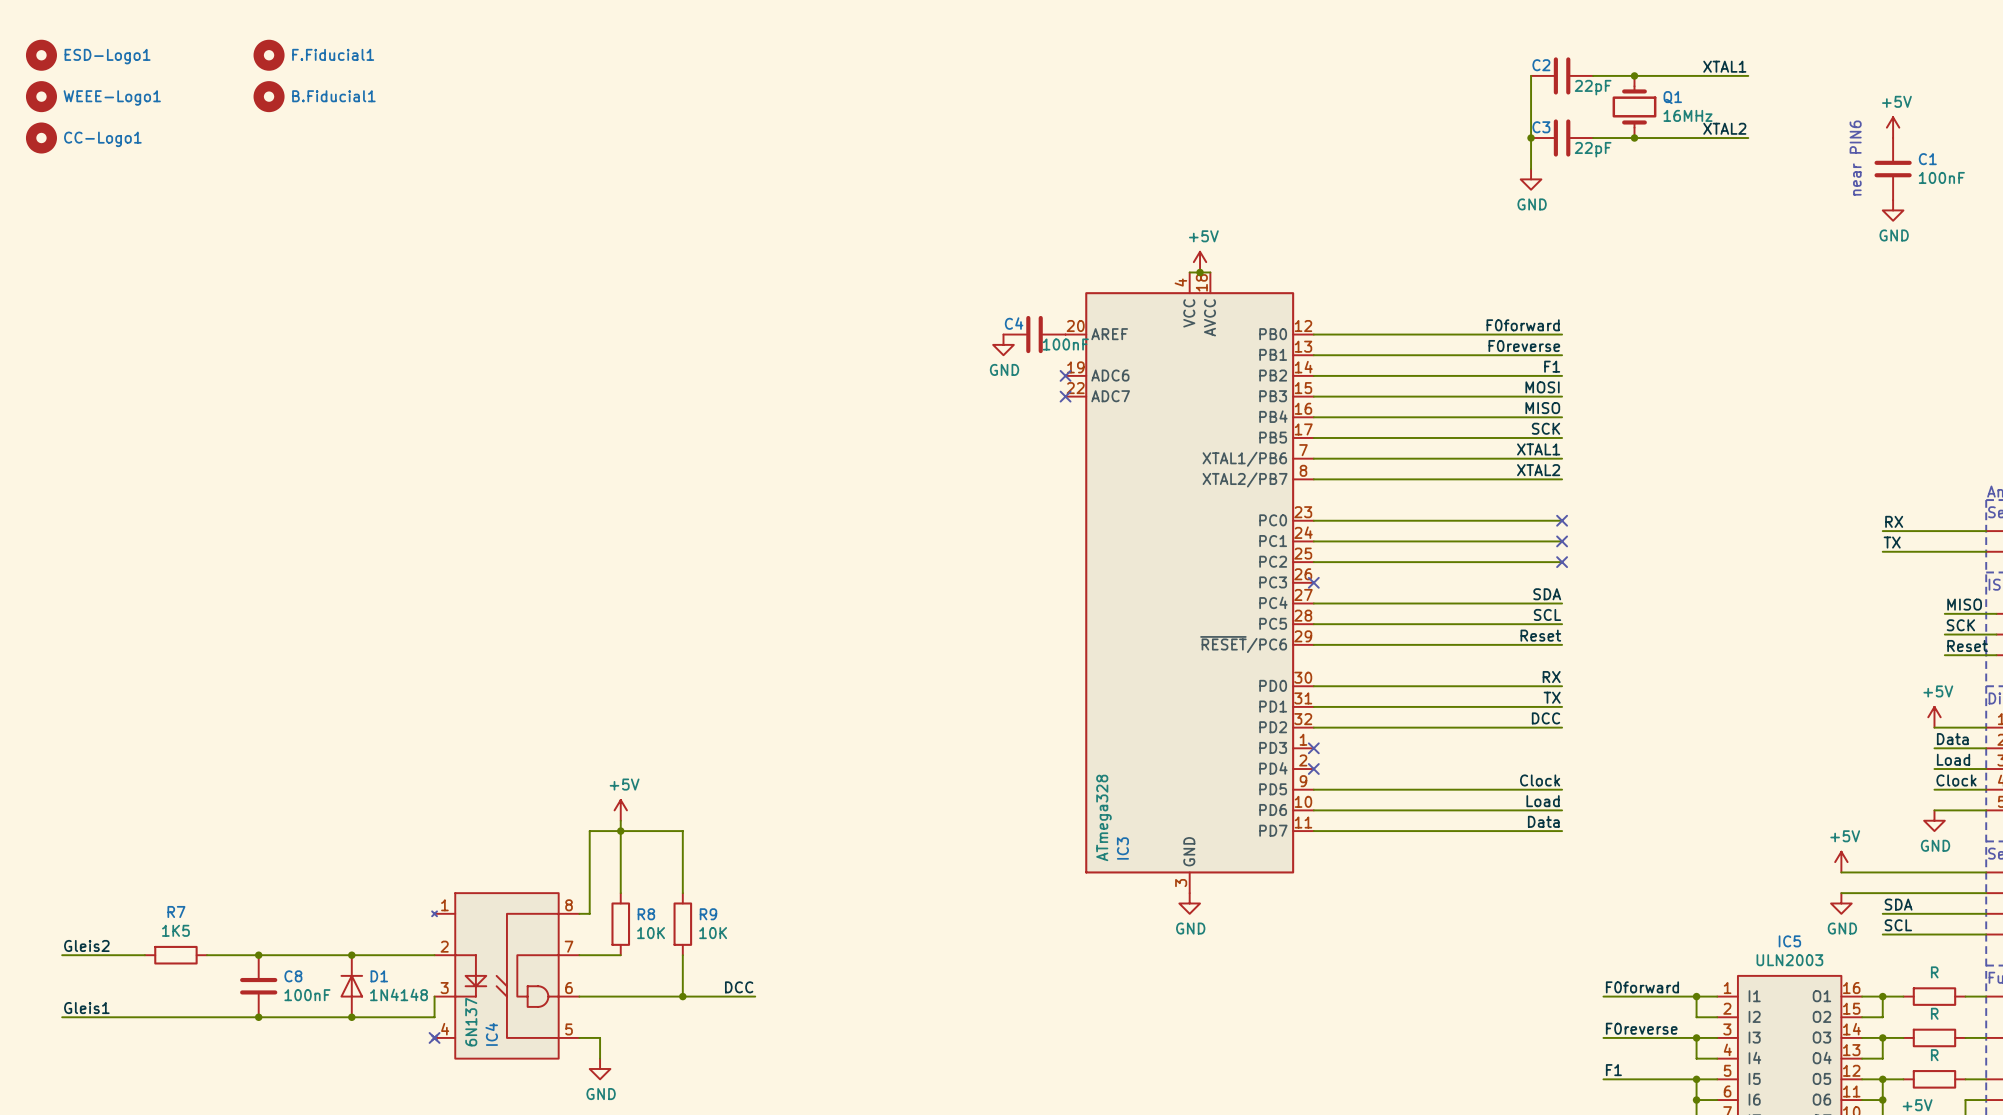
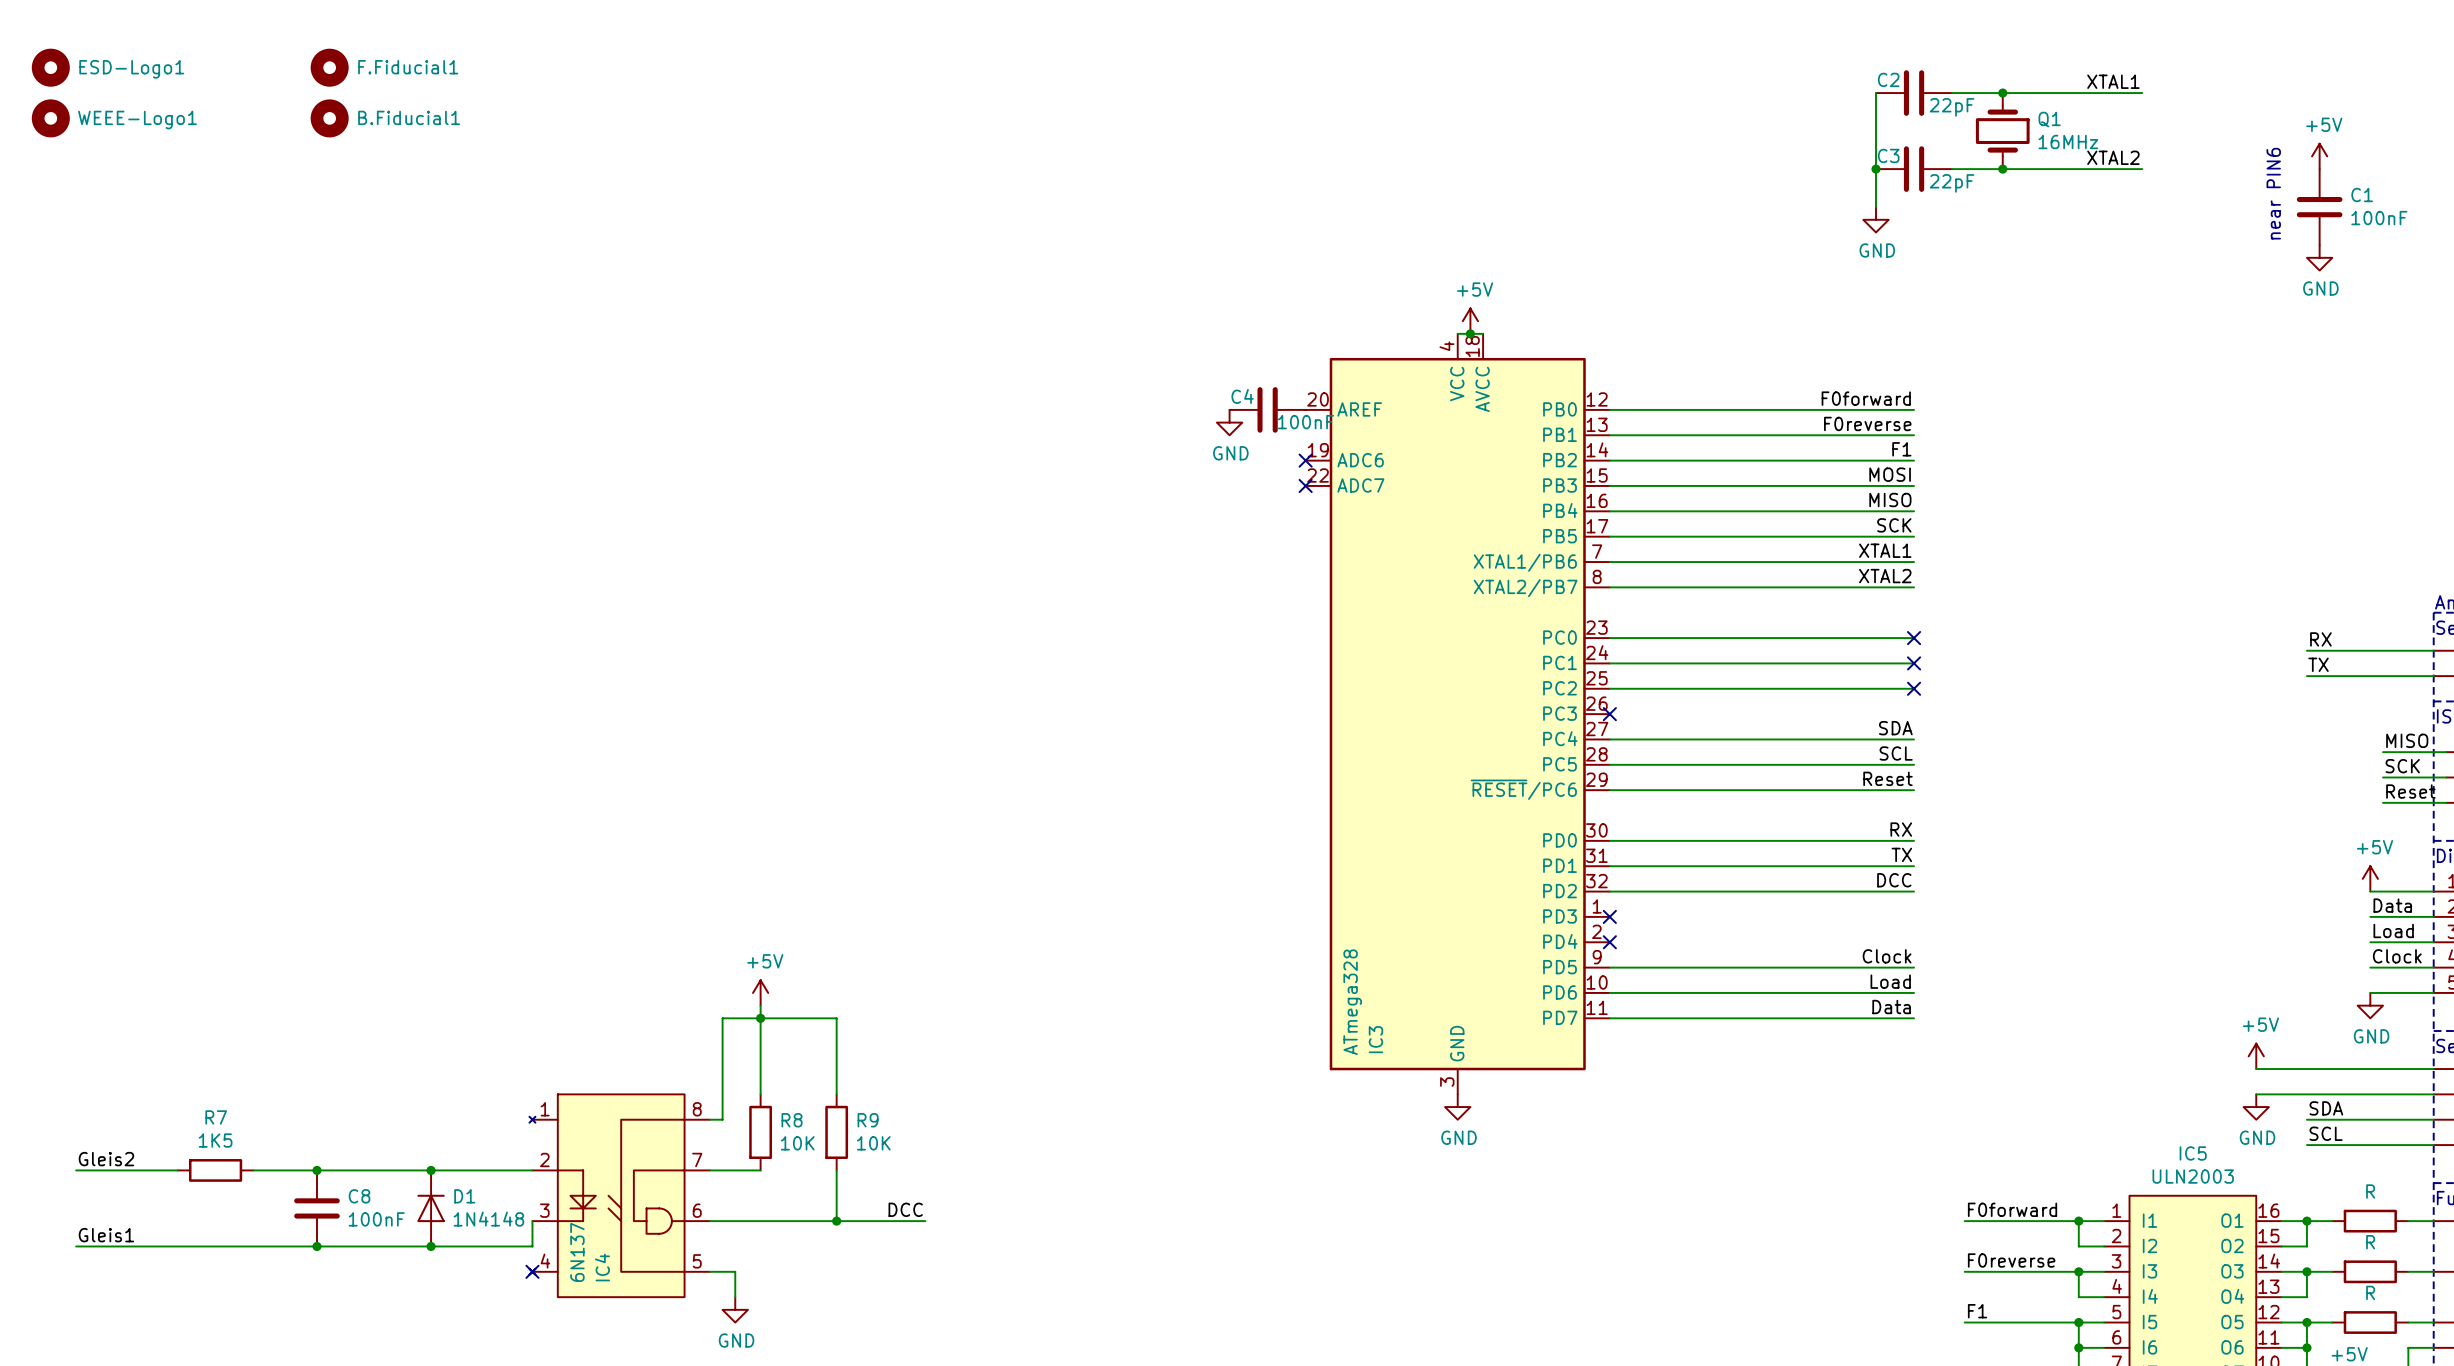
CC-Logo1: (41, 138) -> none

